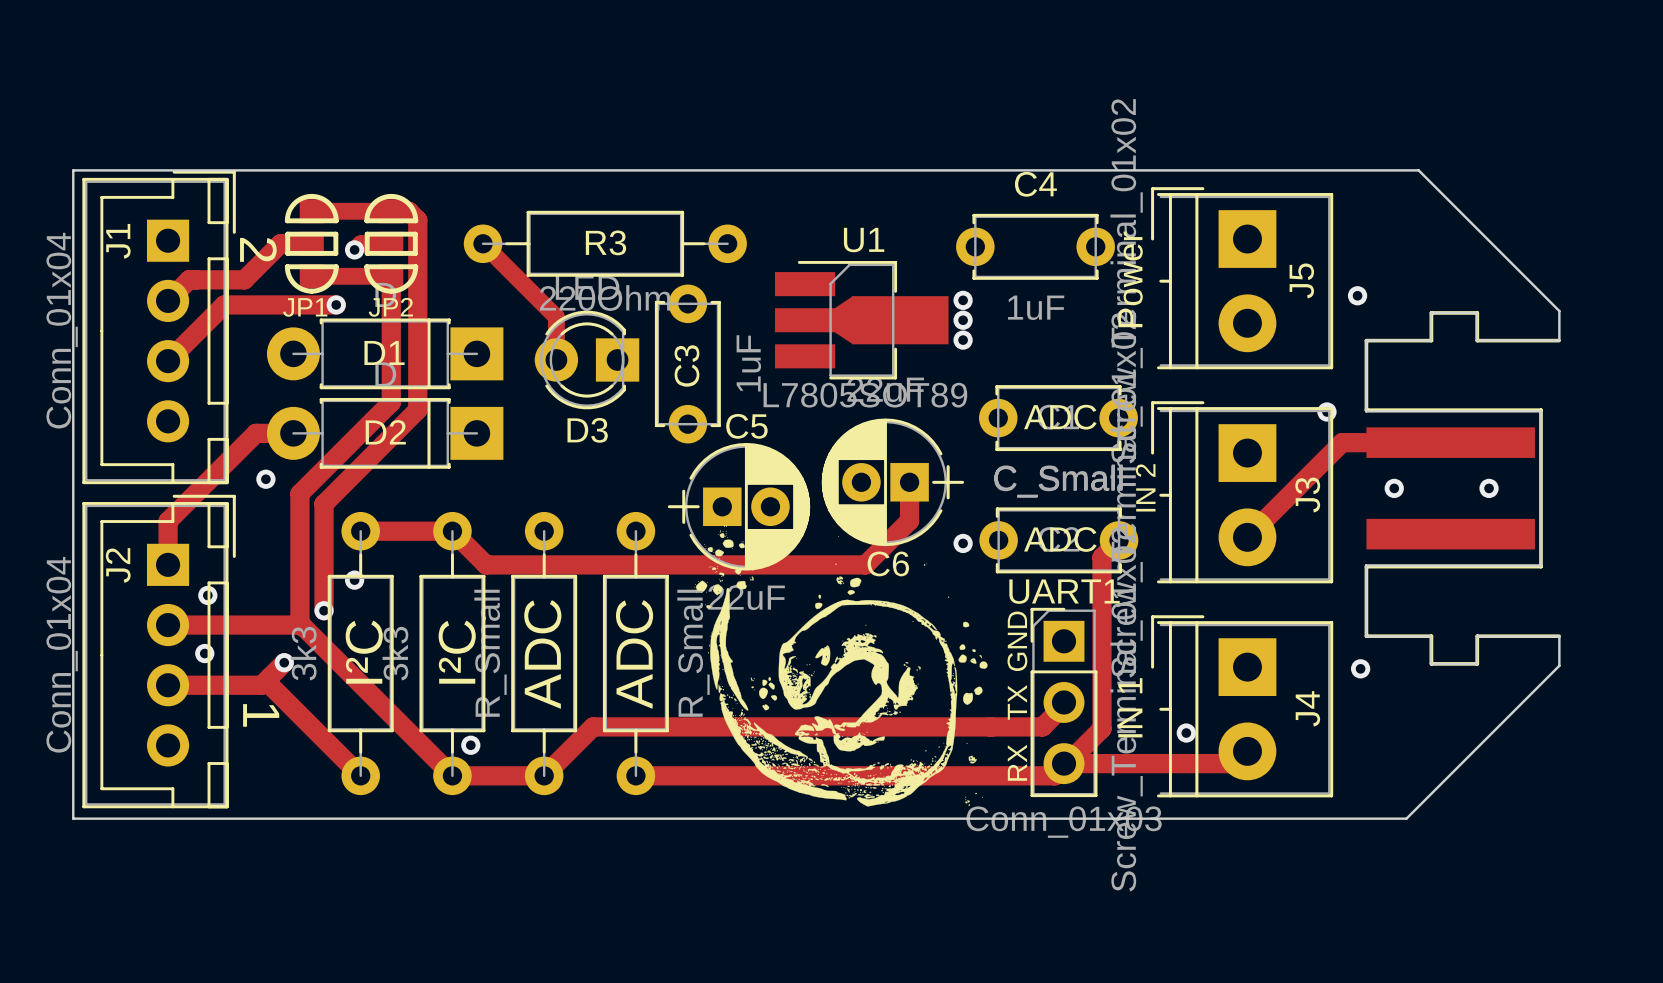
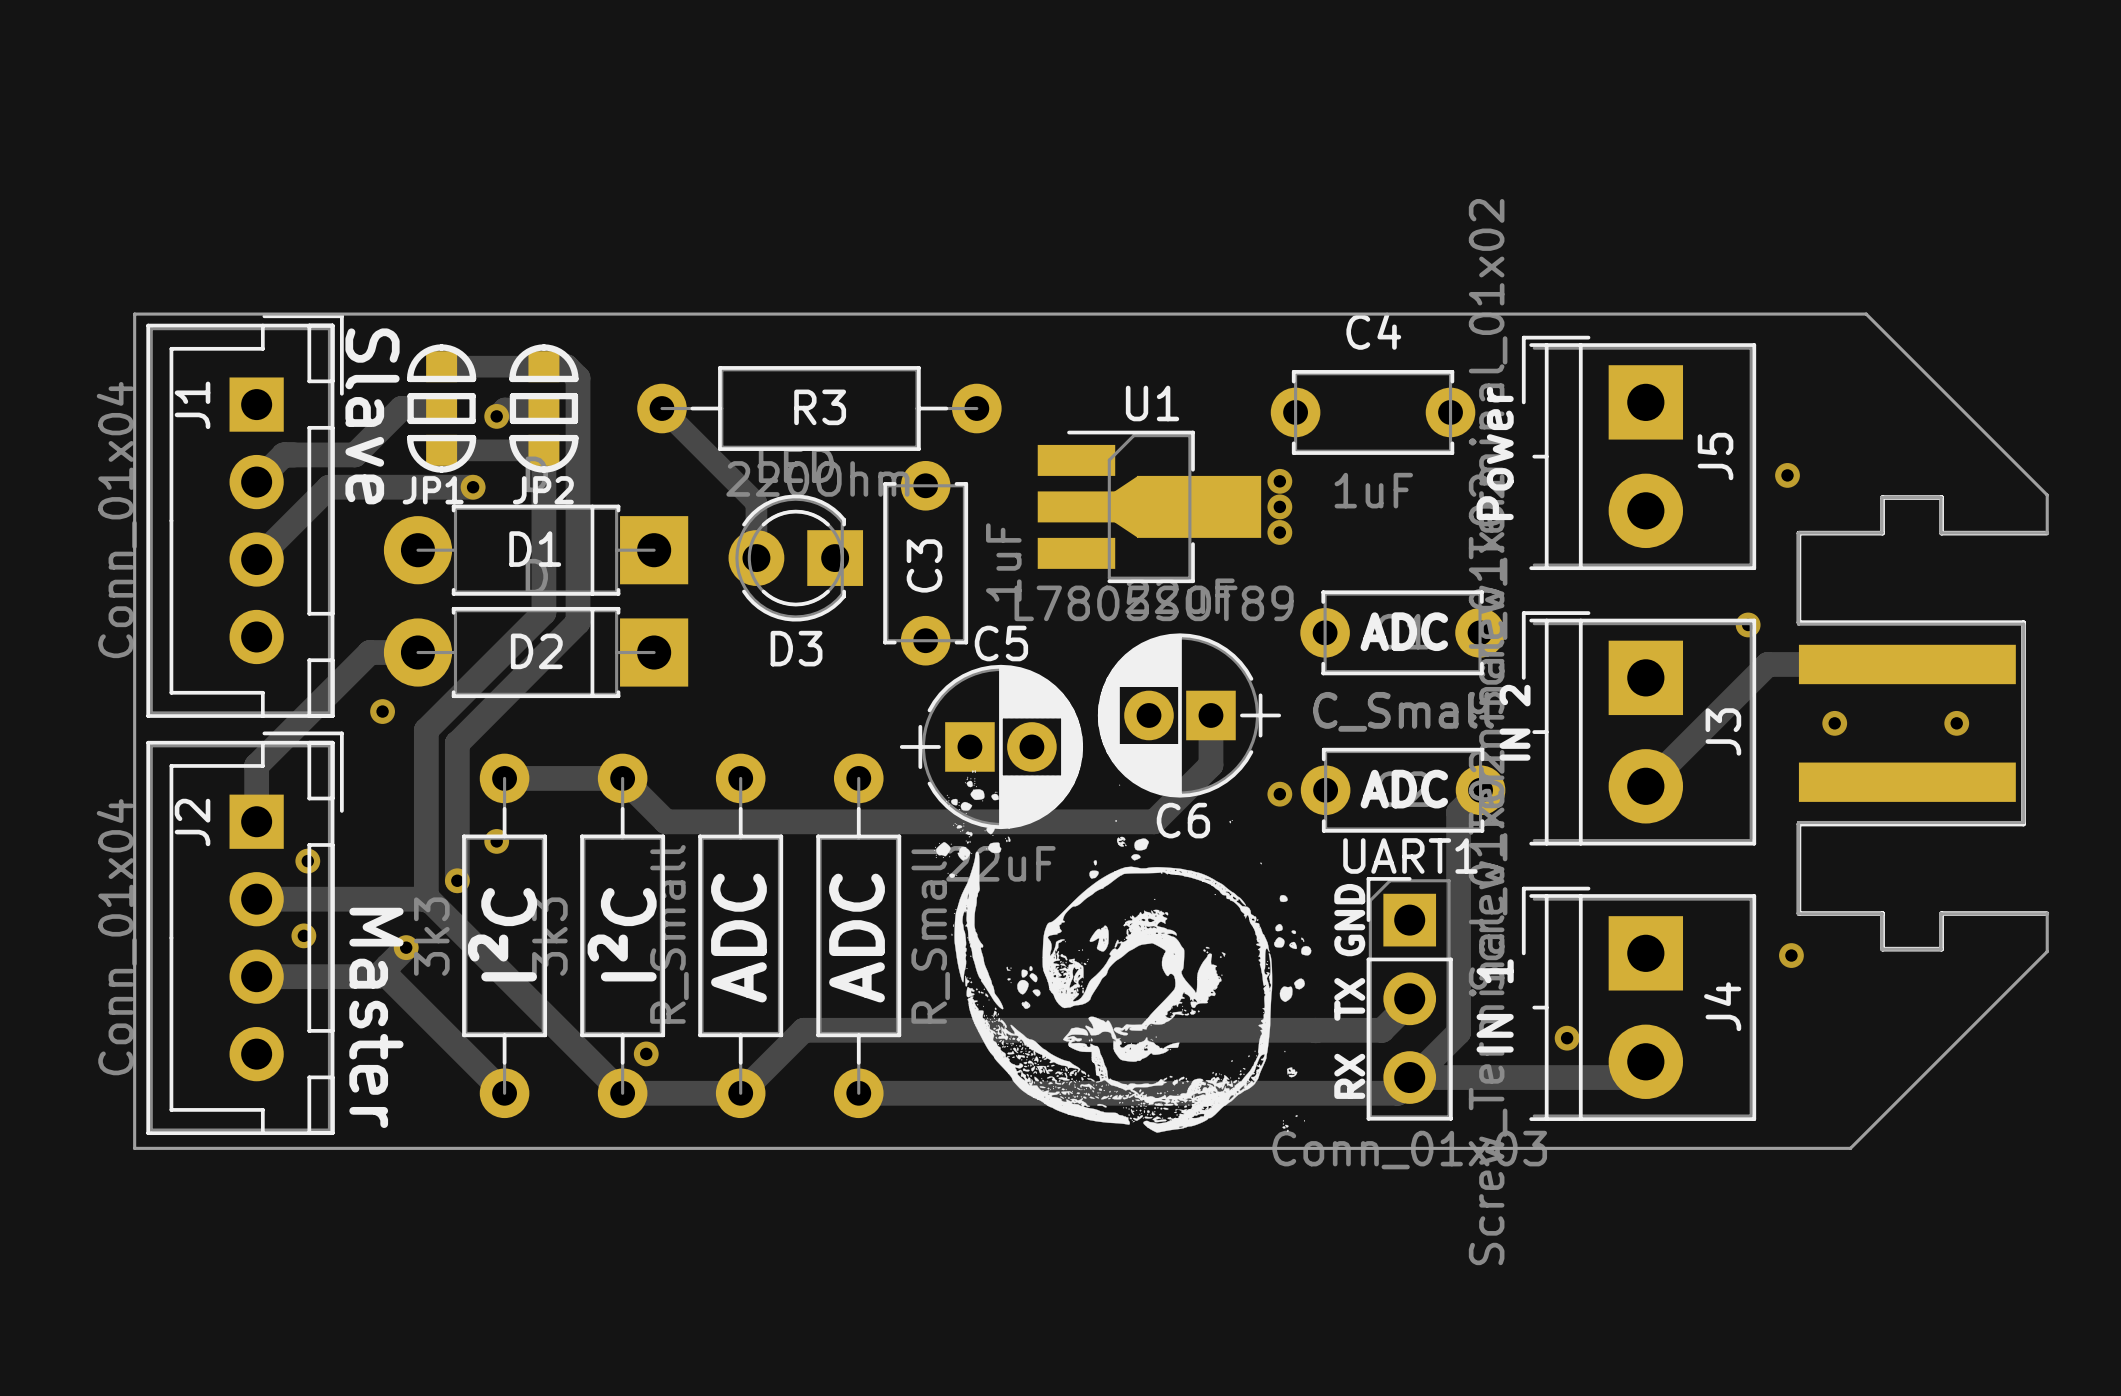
text: 2 (258, 249) -> Slave (372, 416)
text: 1 (261, 715) -> Master (376, 1017)

